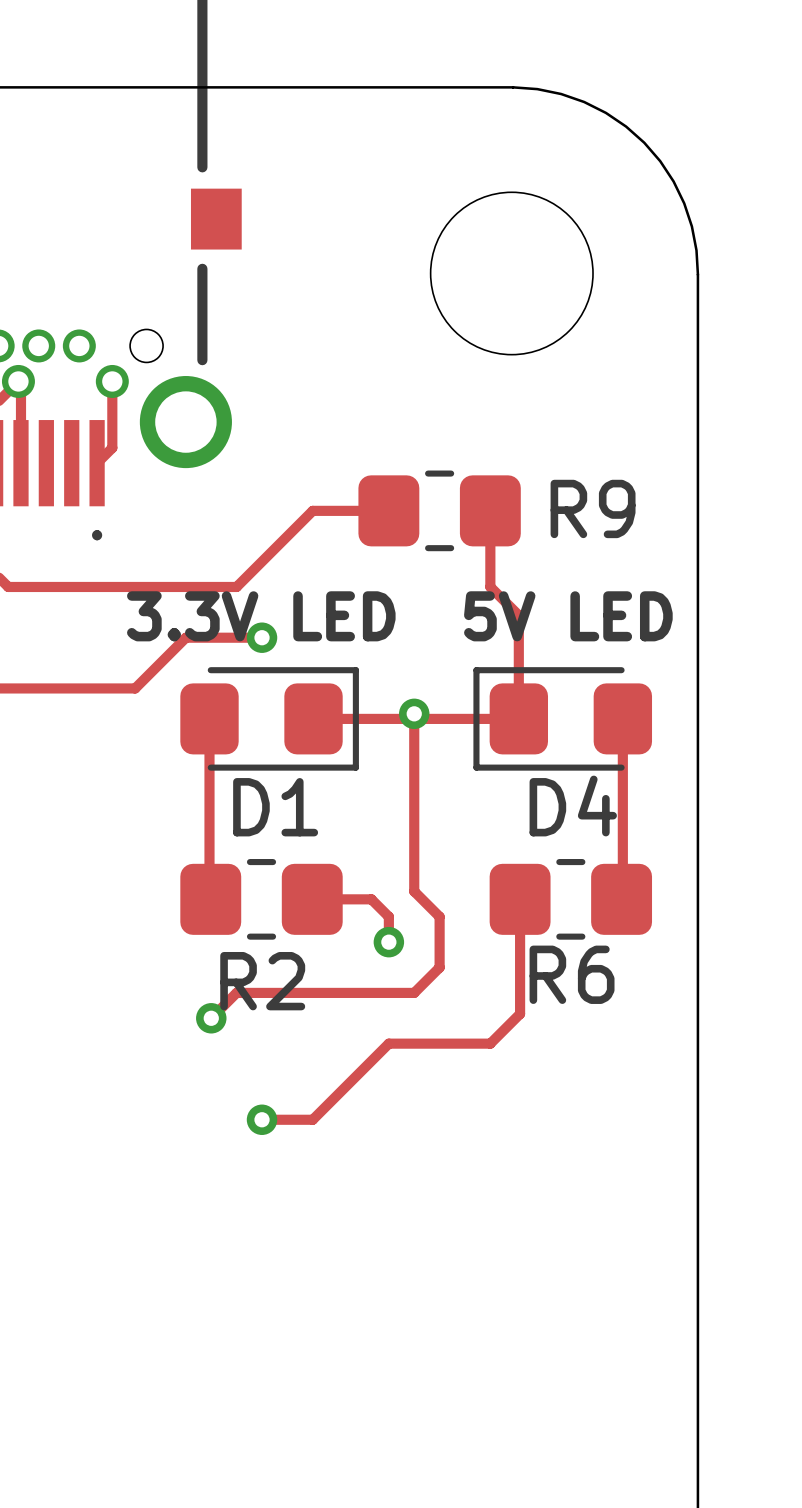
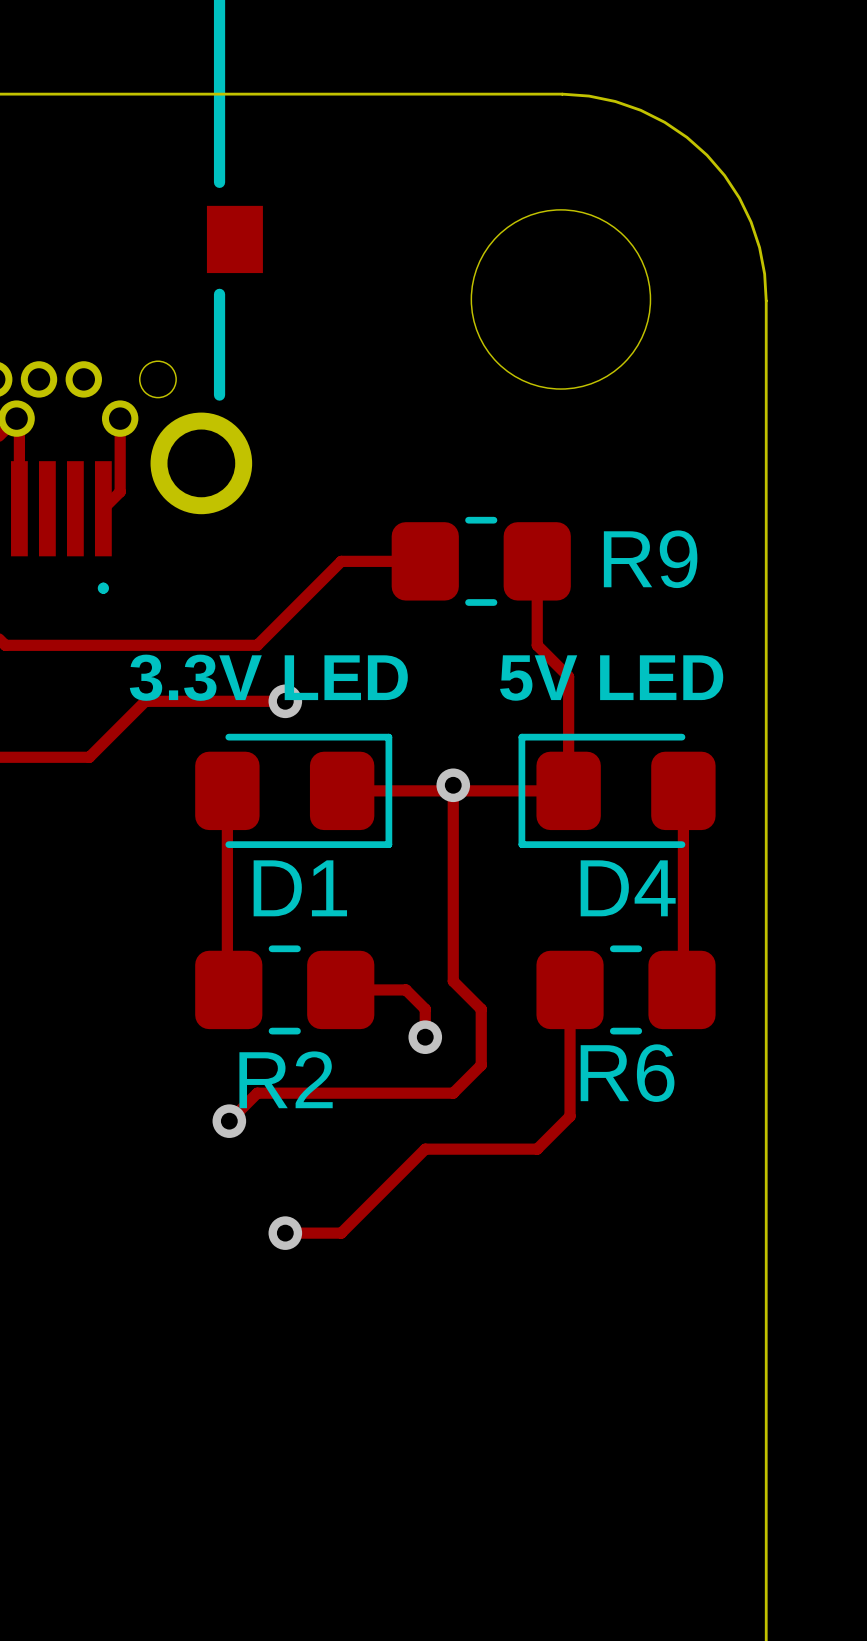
track: (185, 637) (135, 688) (84, 688) -> (201, 701) (145, 701) (89, 757)

